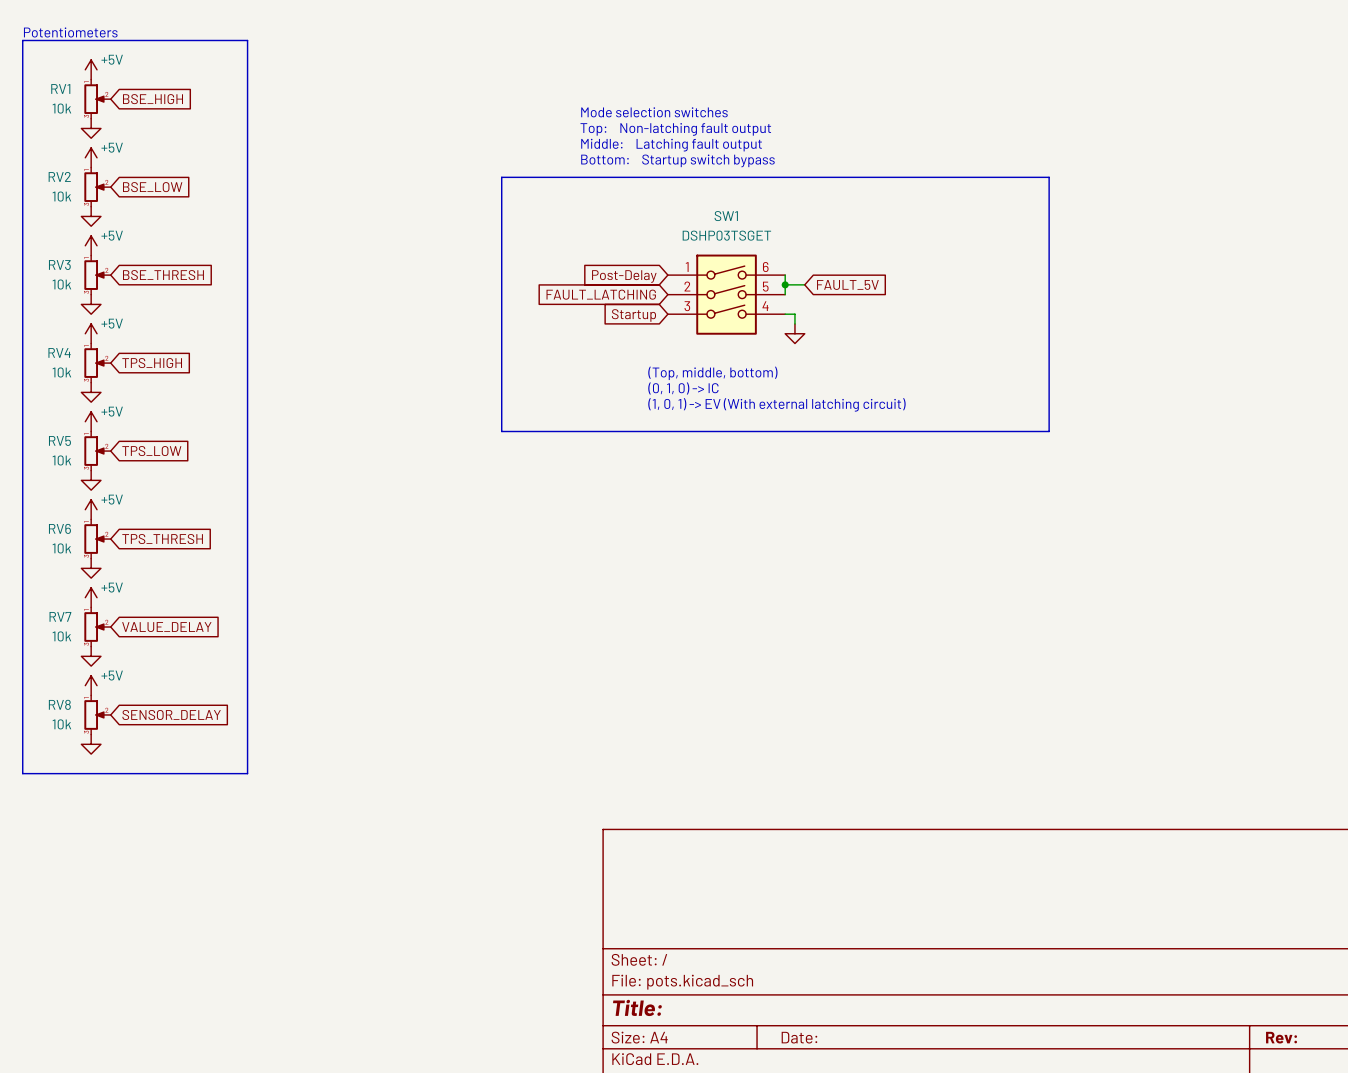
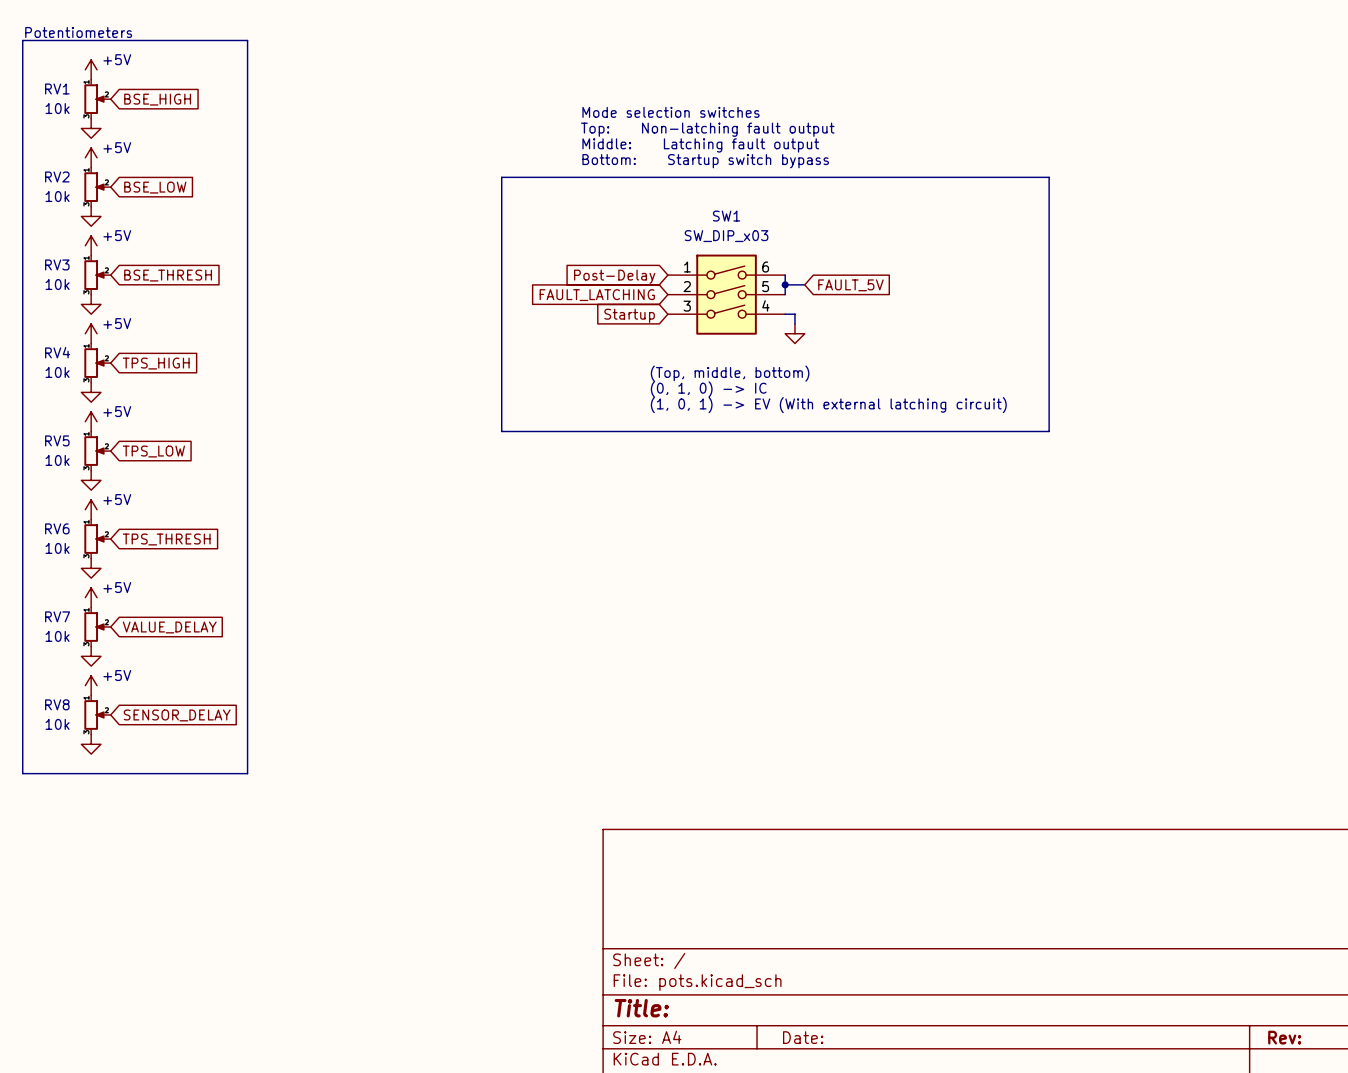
SW1 value: DSHP03TSGET (726, 235) -> SW_DIP_x03 (726, 236)

